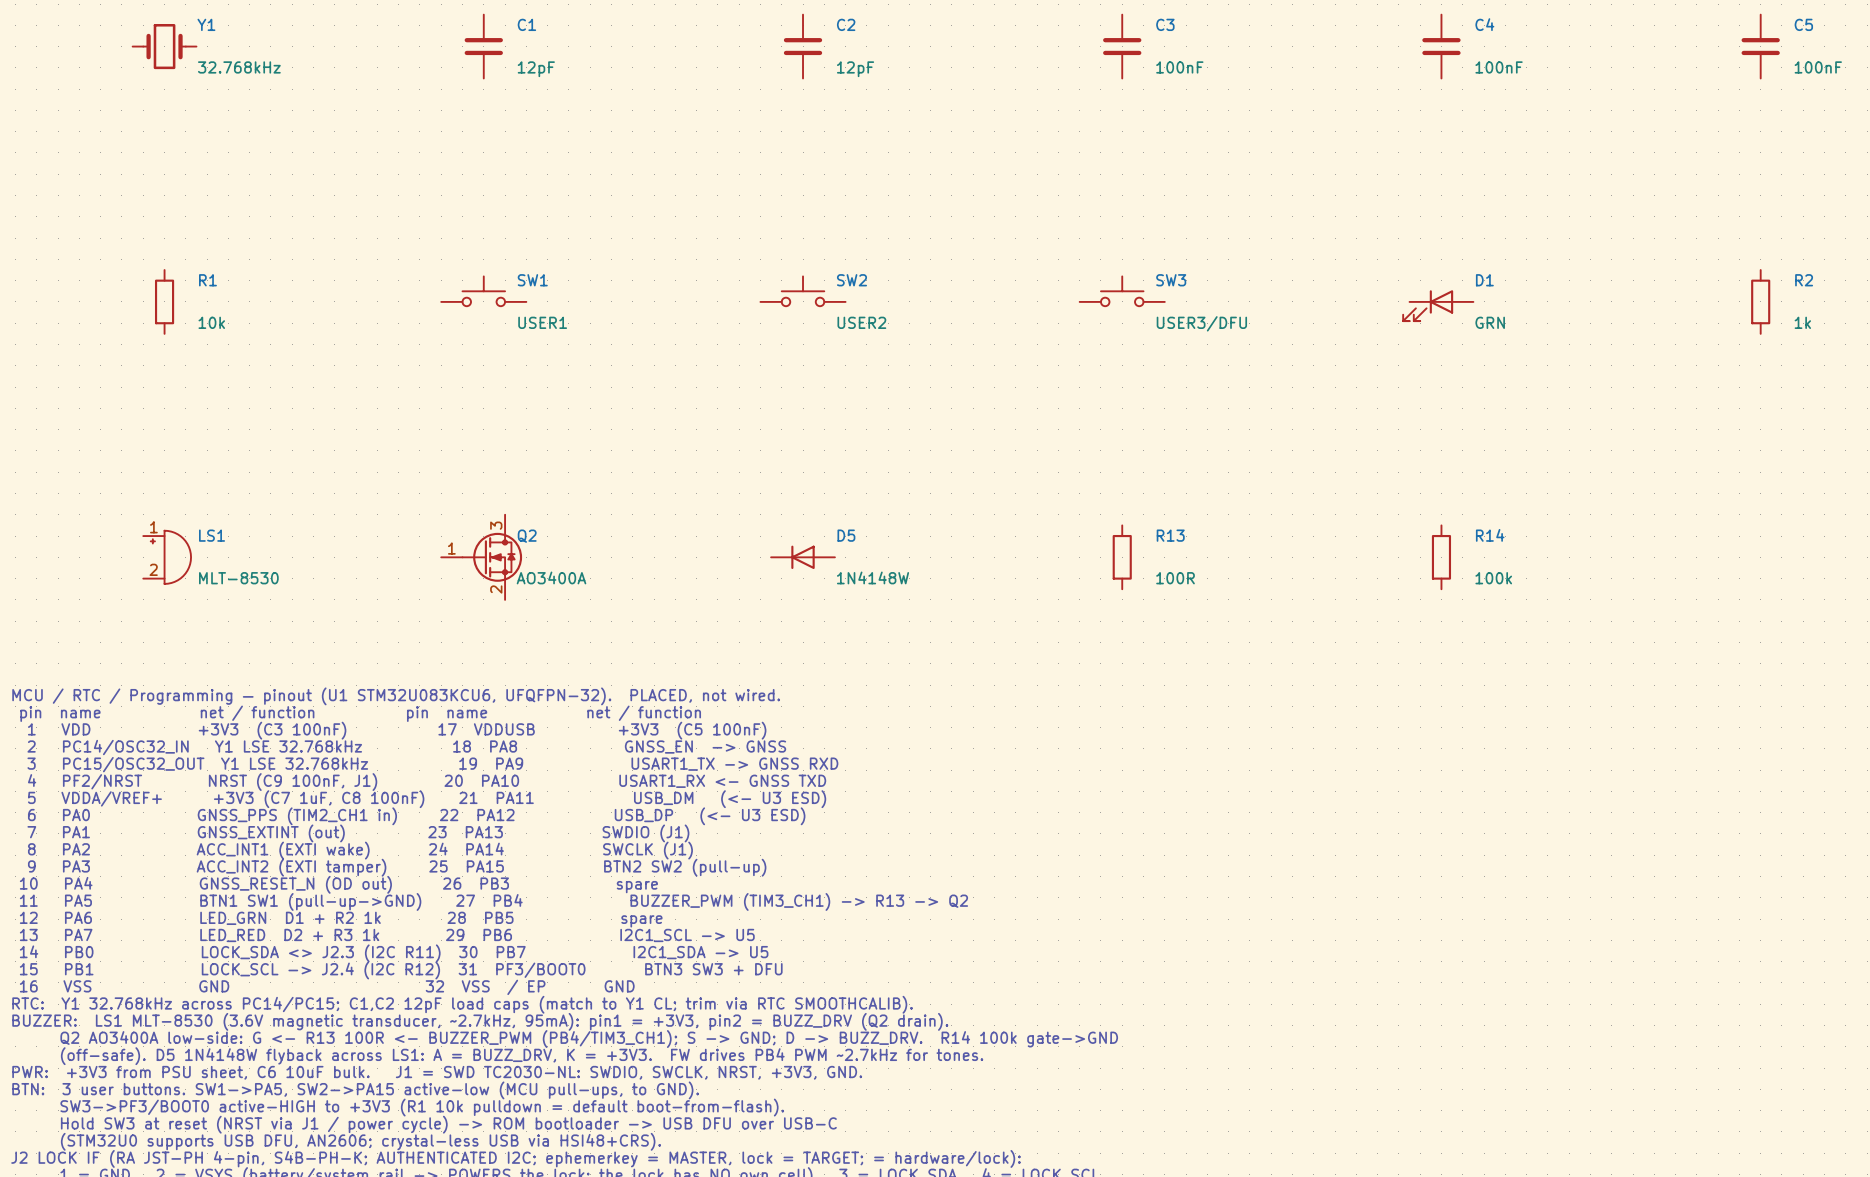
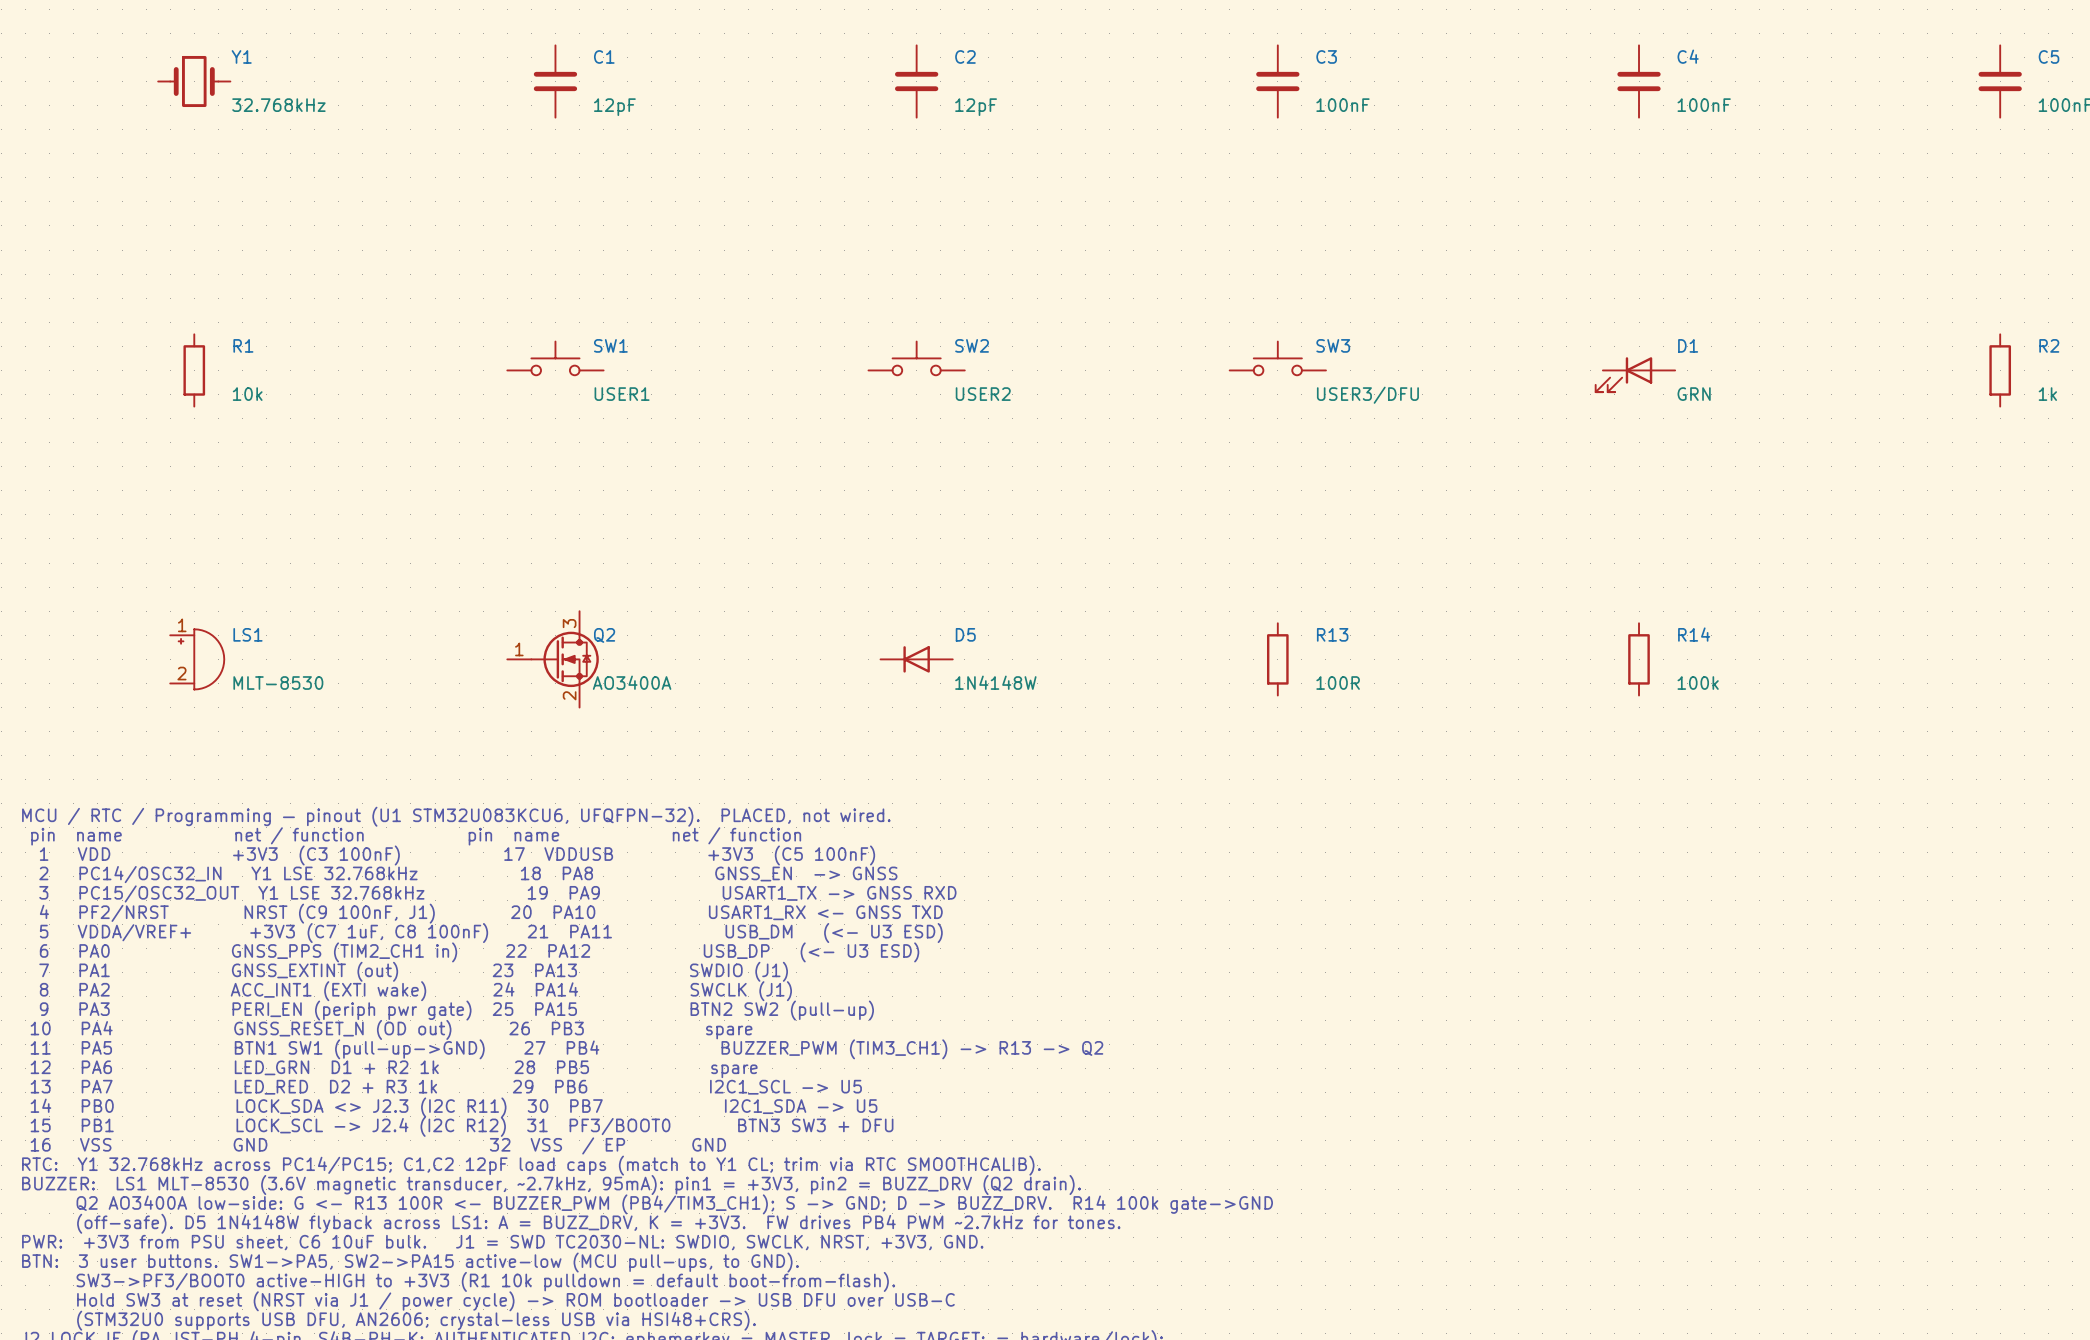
text: 9 PA3 ACC_INT2 (EXTI tamper) 25 PA15 BTN2 SW2 (pull-up) (397, 867) -> 9 PA3 PERI_EN (periph pwr gate) 25 PA15 BTN2 SW2 (pull-up) (456, 1010)

